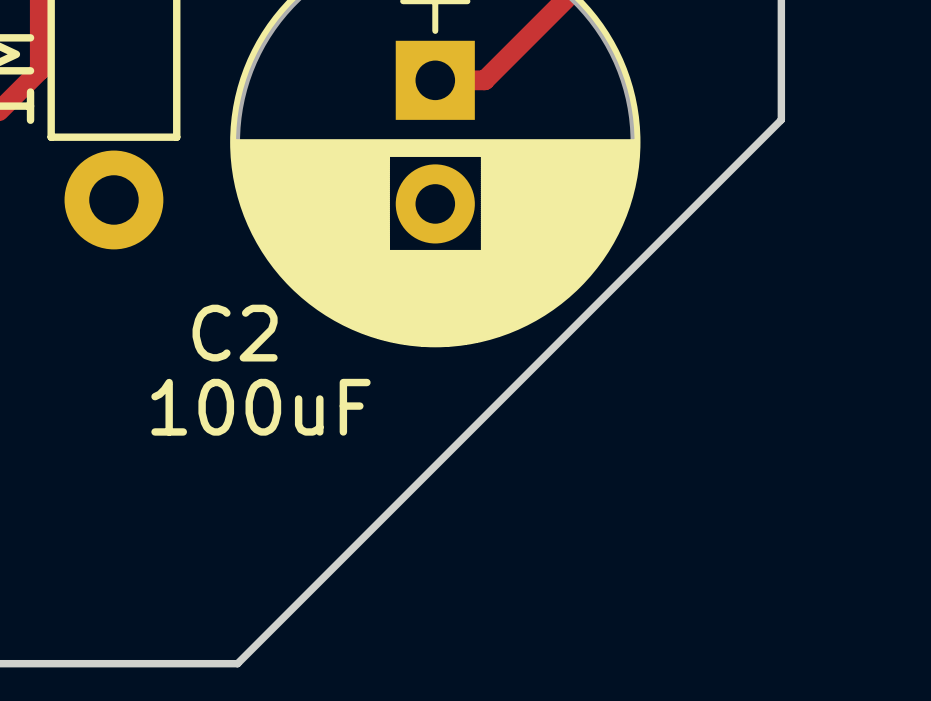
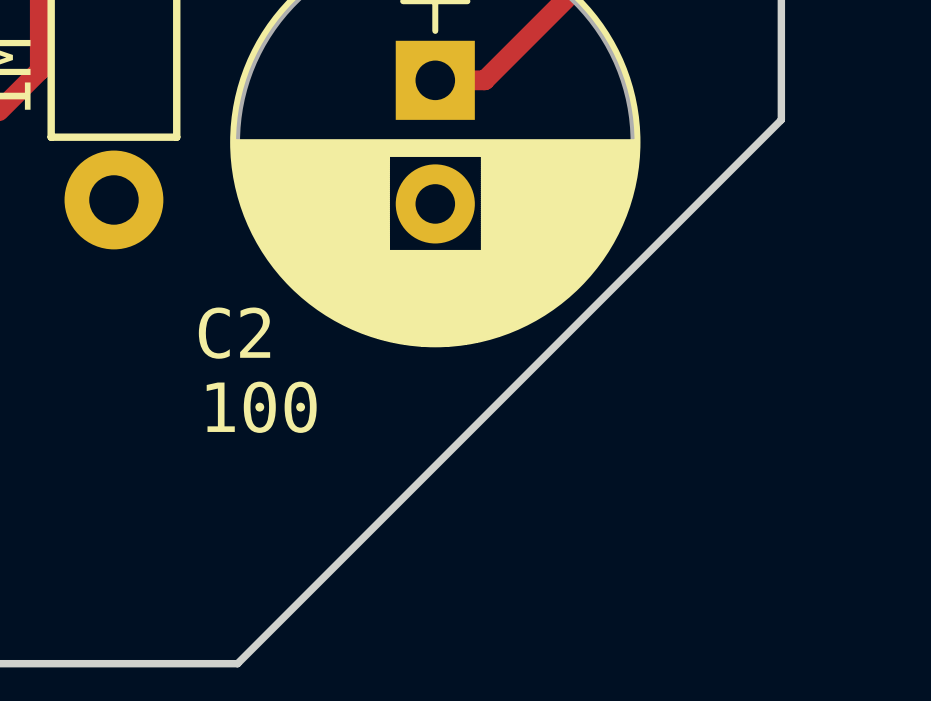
C2 value: 100uF (260, 407) -> 100 (261, 407)

